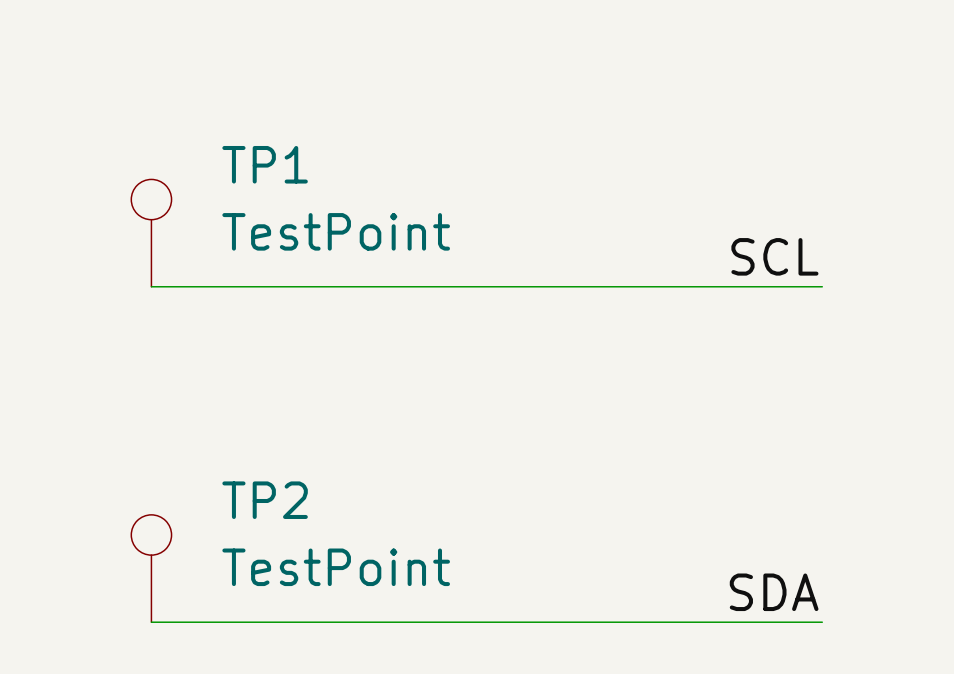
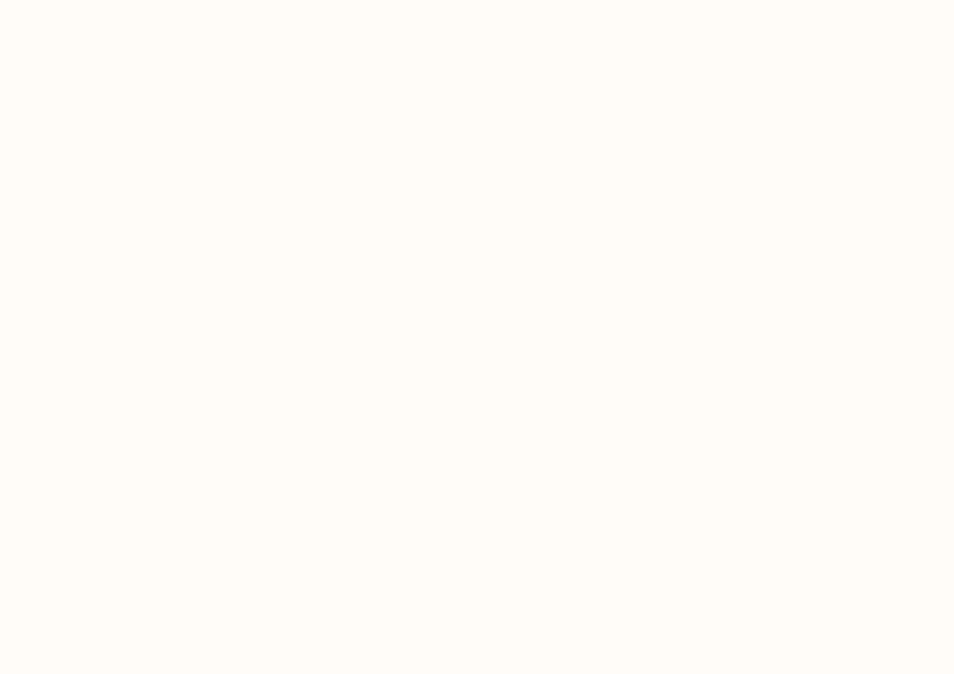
TP1: TestPoint (151, 233) -> none
label: SCL (774, 256) -> none
wire: (151, 286) (822, 286) -> none
TP2: TestPoint (151, 568) -> none
label: SDA (774, 592) -> none
wire: (151, 622) (822, 622) -> none

